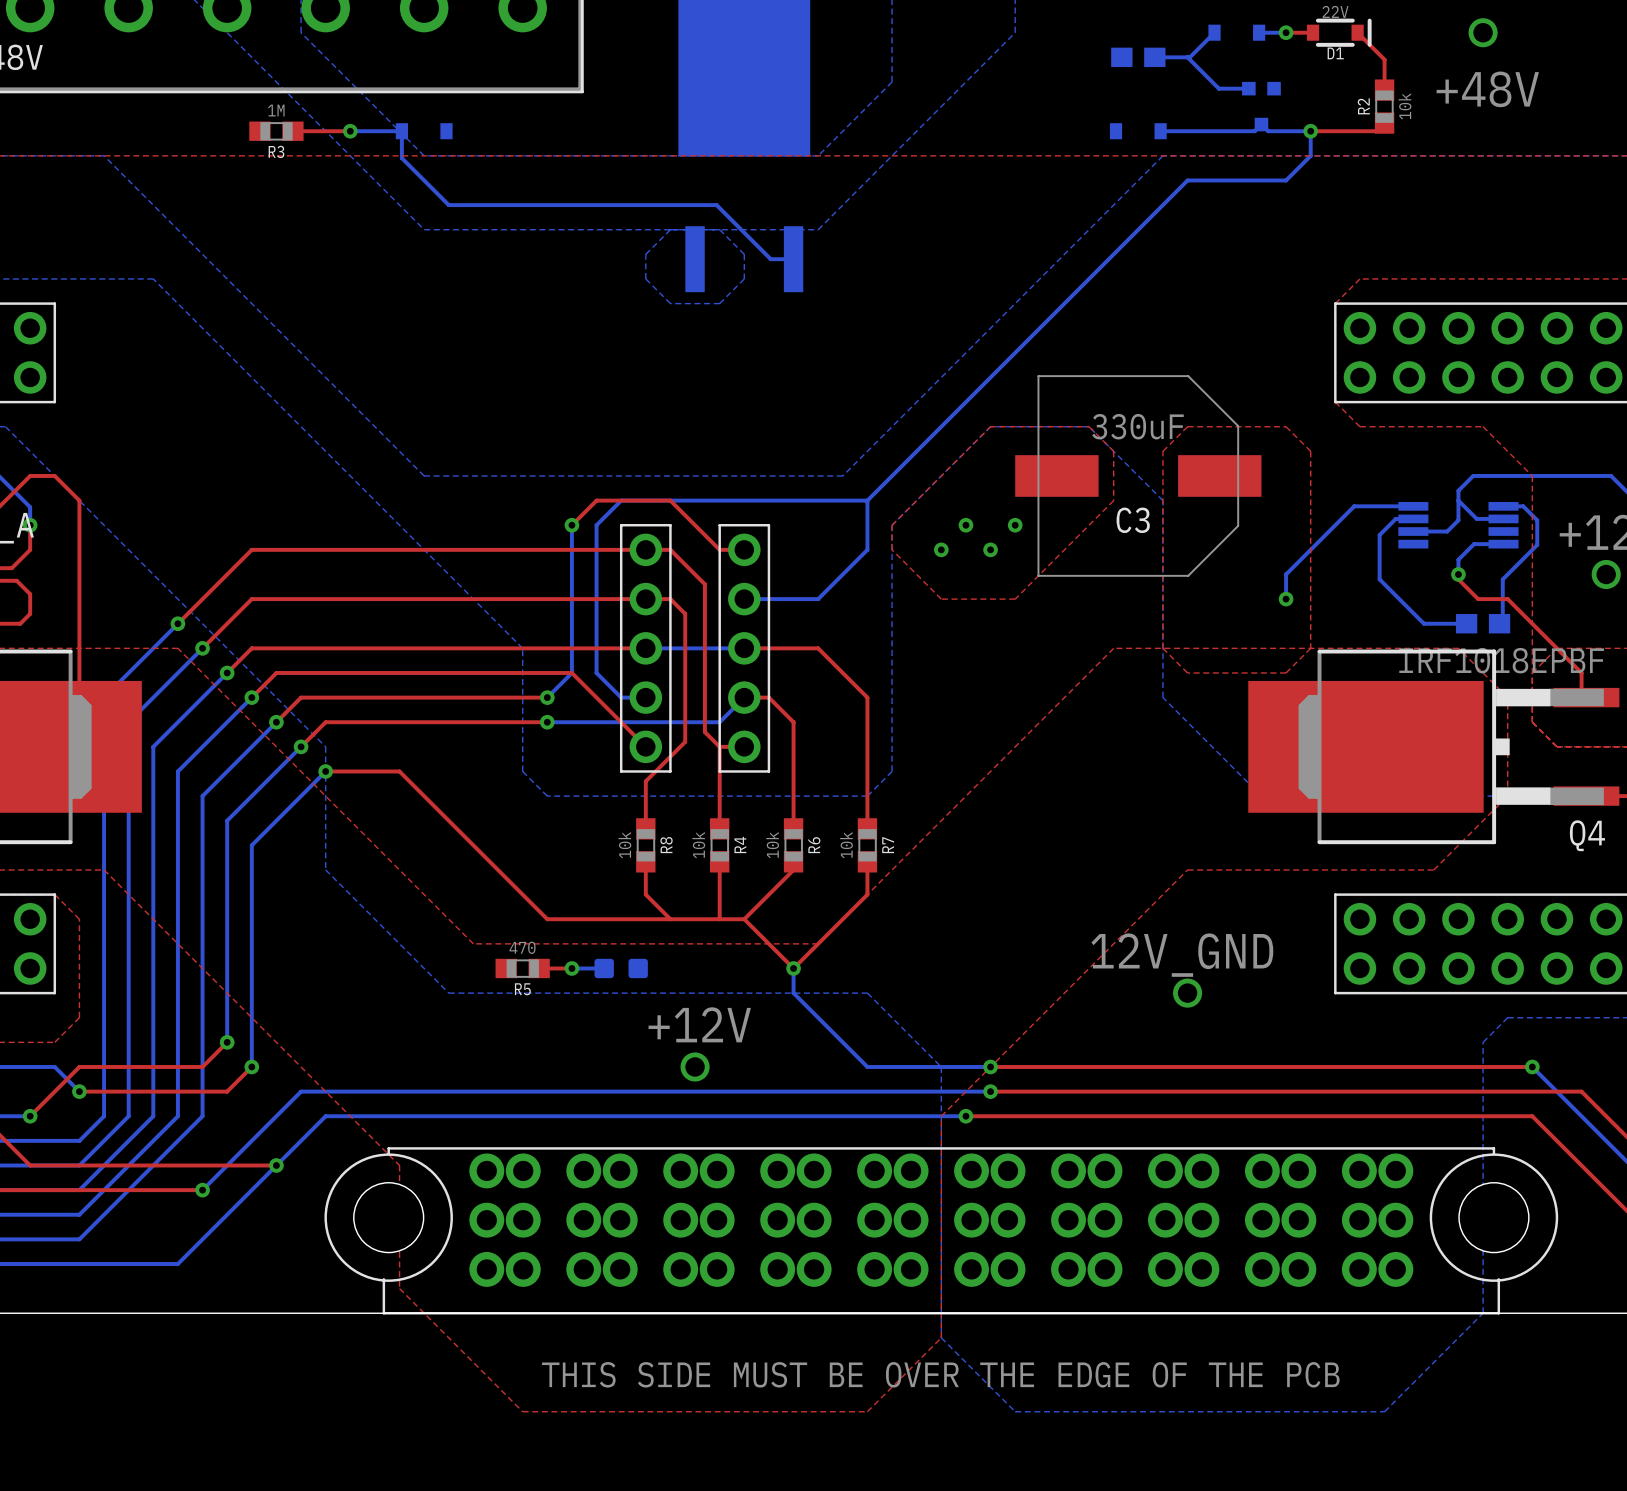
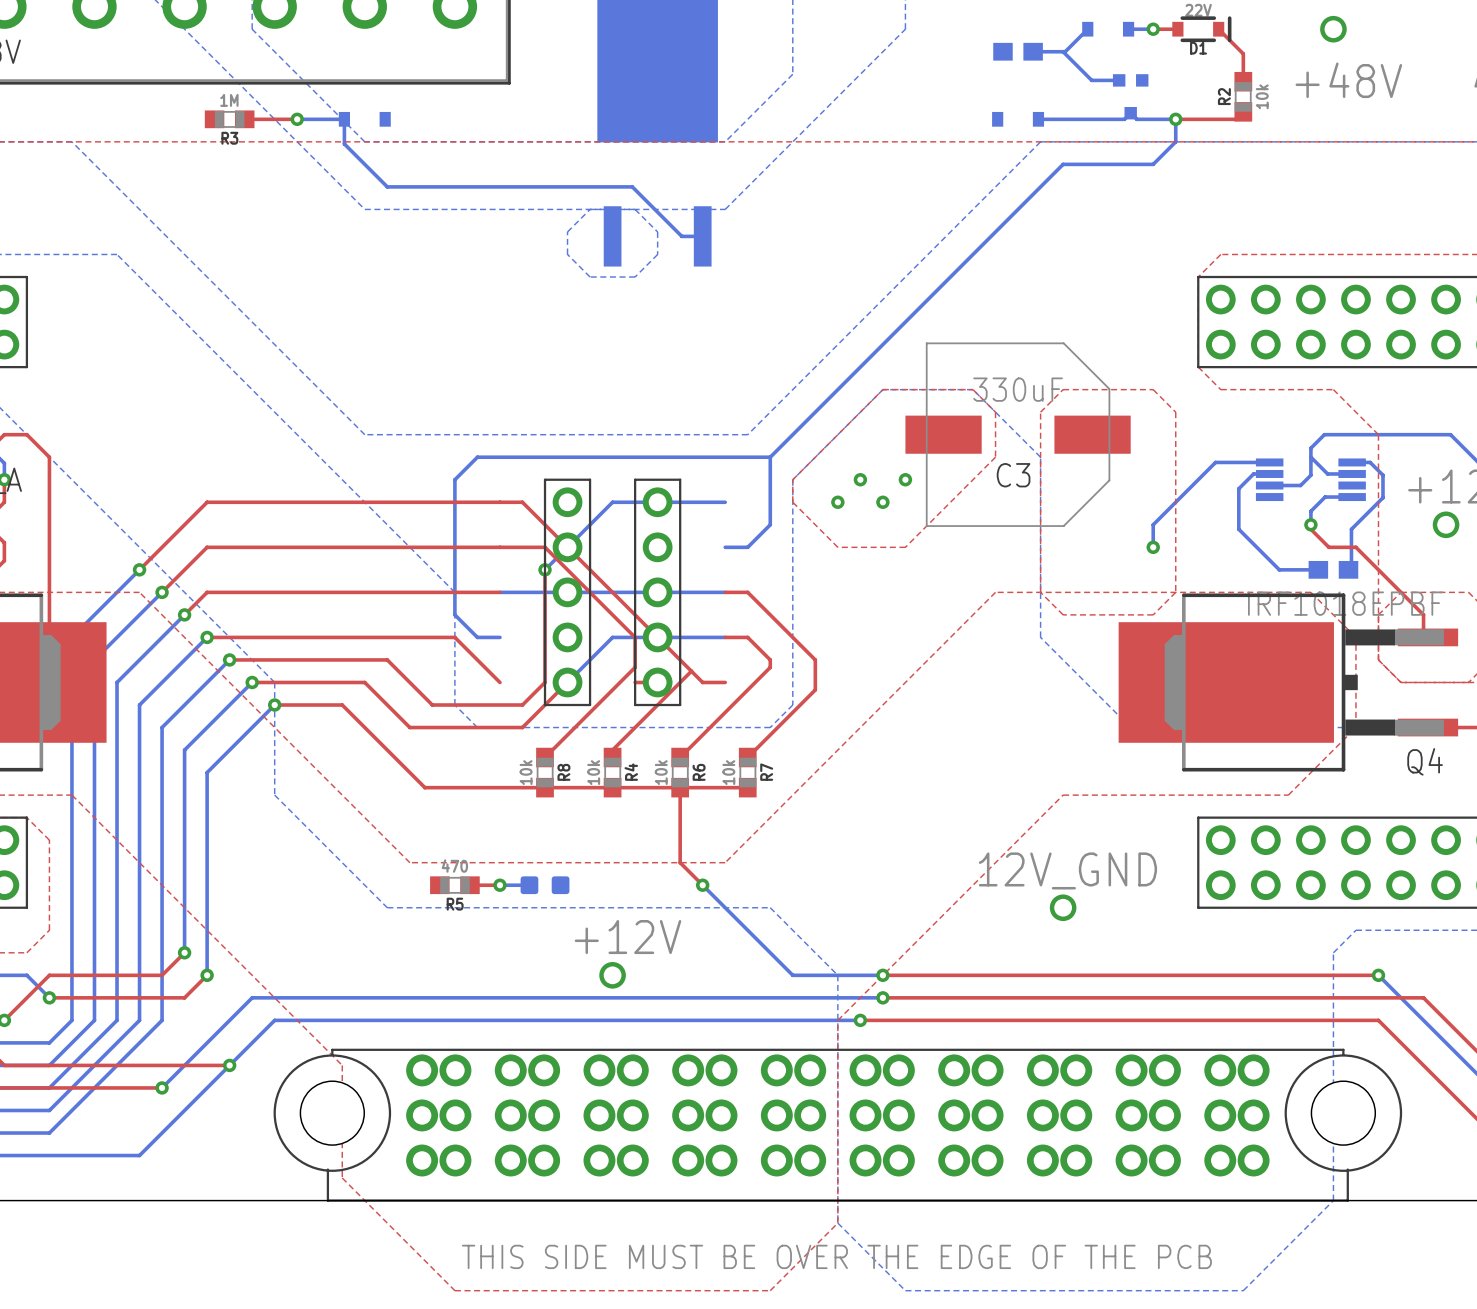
bottom track: (621, 500) (596, 525) (596, 672) (621, 697) (645, 697) -> (545, 457) (477, 457) (454, 479) (454, 614) (477, 637) (499, 637)
top track: (571, 525) (596, 500) (670, 500) (719, 549) (744, 549) -> none
bottom track: (571, 525) (571, 672) (547, 697) -> none
via: (571, 525) -> none
top track: (596, 549) (670, 549) (704, 584) (704, 732) (719, 746) (719, 828) -> (522, 502) (702, 682) (725, 682)
bottom track: none -> (725, 502) (612, 502) (545, 569)
bottom track: (867, 549) (818, 599) (744, 599) -> (770, 502) (770, 524) (747, 547) (725, 547)
top track: (621, 599) (670, 599) (685, 613) (685, 741) (645, 781) (645, 828) -> (545, 547) (635, 637) (635, 667) (545, 757)
via: none -> (545, 569)
top track: (571, 648) (645, 648) -> none
bottom track: none -> (499, 592) (567, 592)
top track: (744, 648) (818, 648) (867, 697) (867, 722) -> (725, 637) (747, 637) (770, 659)
bottom track: none -> (657, 592) (725, 592)
top track: none -> (725, 592) (747, 592) (815, 659) (815, 689) (747, 757)
top track: (251, 697) (276, 672) (571, 672) (645, 746) -> (252, 682) (364, 682) (409, 727) (522, 727) (567, 682)
top track: (301, 697) (276, 722) -> (252, 637) (207, 637)
top track: (522, 697) (547, 697) -> (454, 637) (499, 682)
via: (547, 697) -> none
top track: (744, 697) (768, 697) (793, 722) (793, 828) -> none
bottom track: (744, 697) (719, 722) (547, 722) -> none
bottom track: none -> (725, 637) (612, 637) (567, 682)
top track: (325, 722) (301, 746) -> (274, 659) (229, 659)
top track: (448, 722) (547, 722) -> (387, 659) (432, 705) (522, 705) (545, 682) (545, 569)
via: (547, 722) -> none
top track: (867, 730) (867, 828) -> (770, 667) (680, 757)
top track: none -> (691, 671) (612, 750) (612, 757)
R8 position: (645, 845) -> (545, 772)
R4 position: (719, 845) -> (612, 772)
R6 position: (793, 845) -> (680, 772)
R7 position: (867, 845) -> (747, 772)
top track: (489, 861) (547, 919) (744, 919) -> (424, 787) (747, 787)
top track: (645, 861) (645, 894) (670, 919) -> none
top track: (719, 861) (719, 919) -> none
top track: (793, 861) (793, 869) (744, 919) -> none
top track: (867, 861) (867, 894) (793, 968) -> none
top track: (744, 919) (768, 943) -> (680, 787) (680, 862)
bottom track: (793, 968) (793, 993) (867, 1066) (892, 1066) -> (702, 885) (792, 975)

